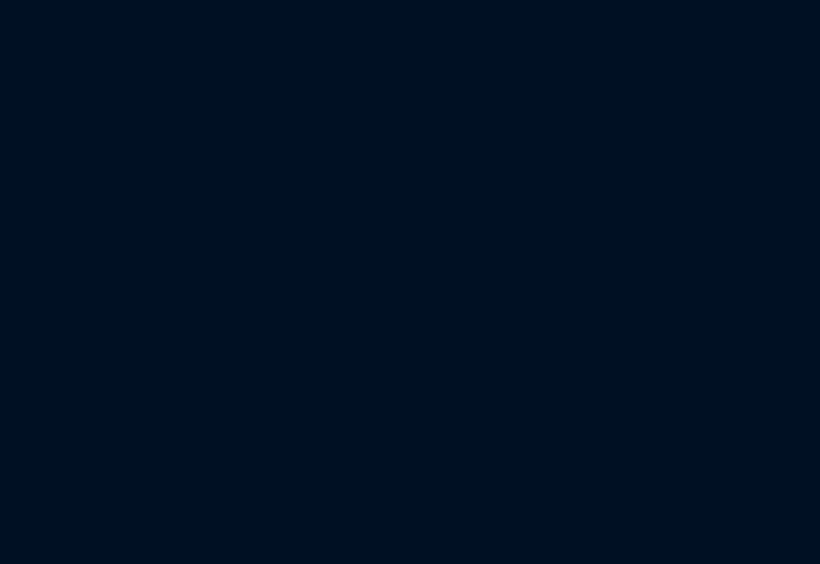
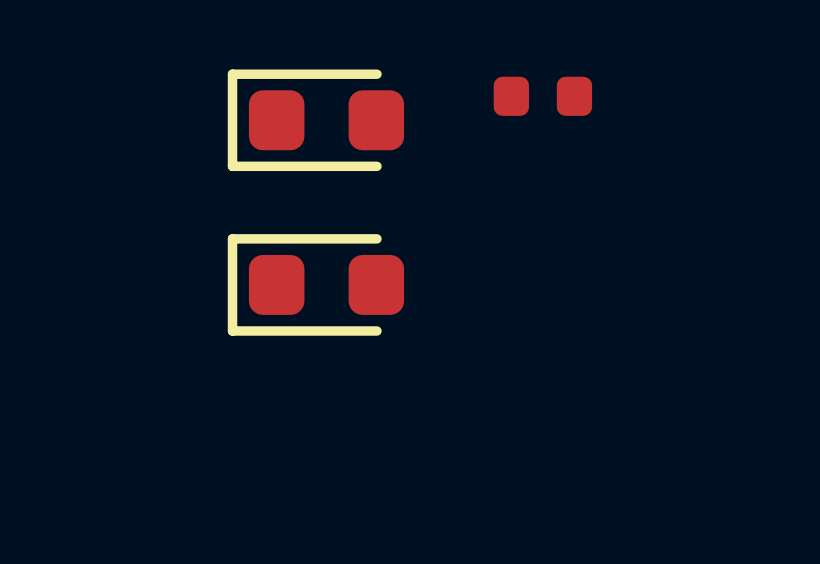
part: none -> (542, 96)
part: none -> (315, 120)
part: none -> (315, 284)

